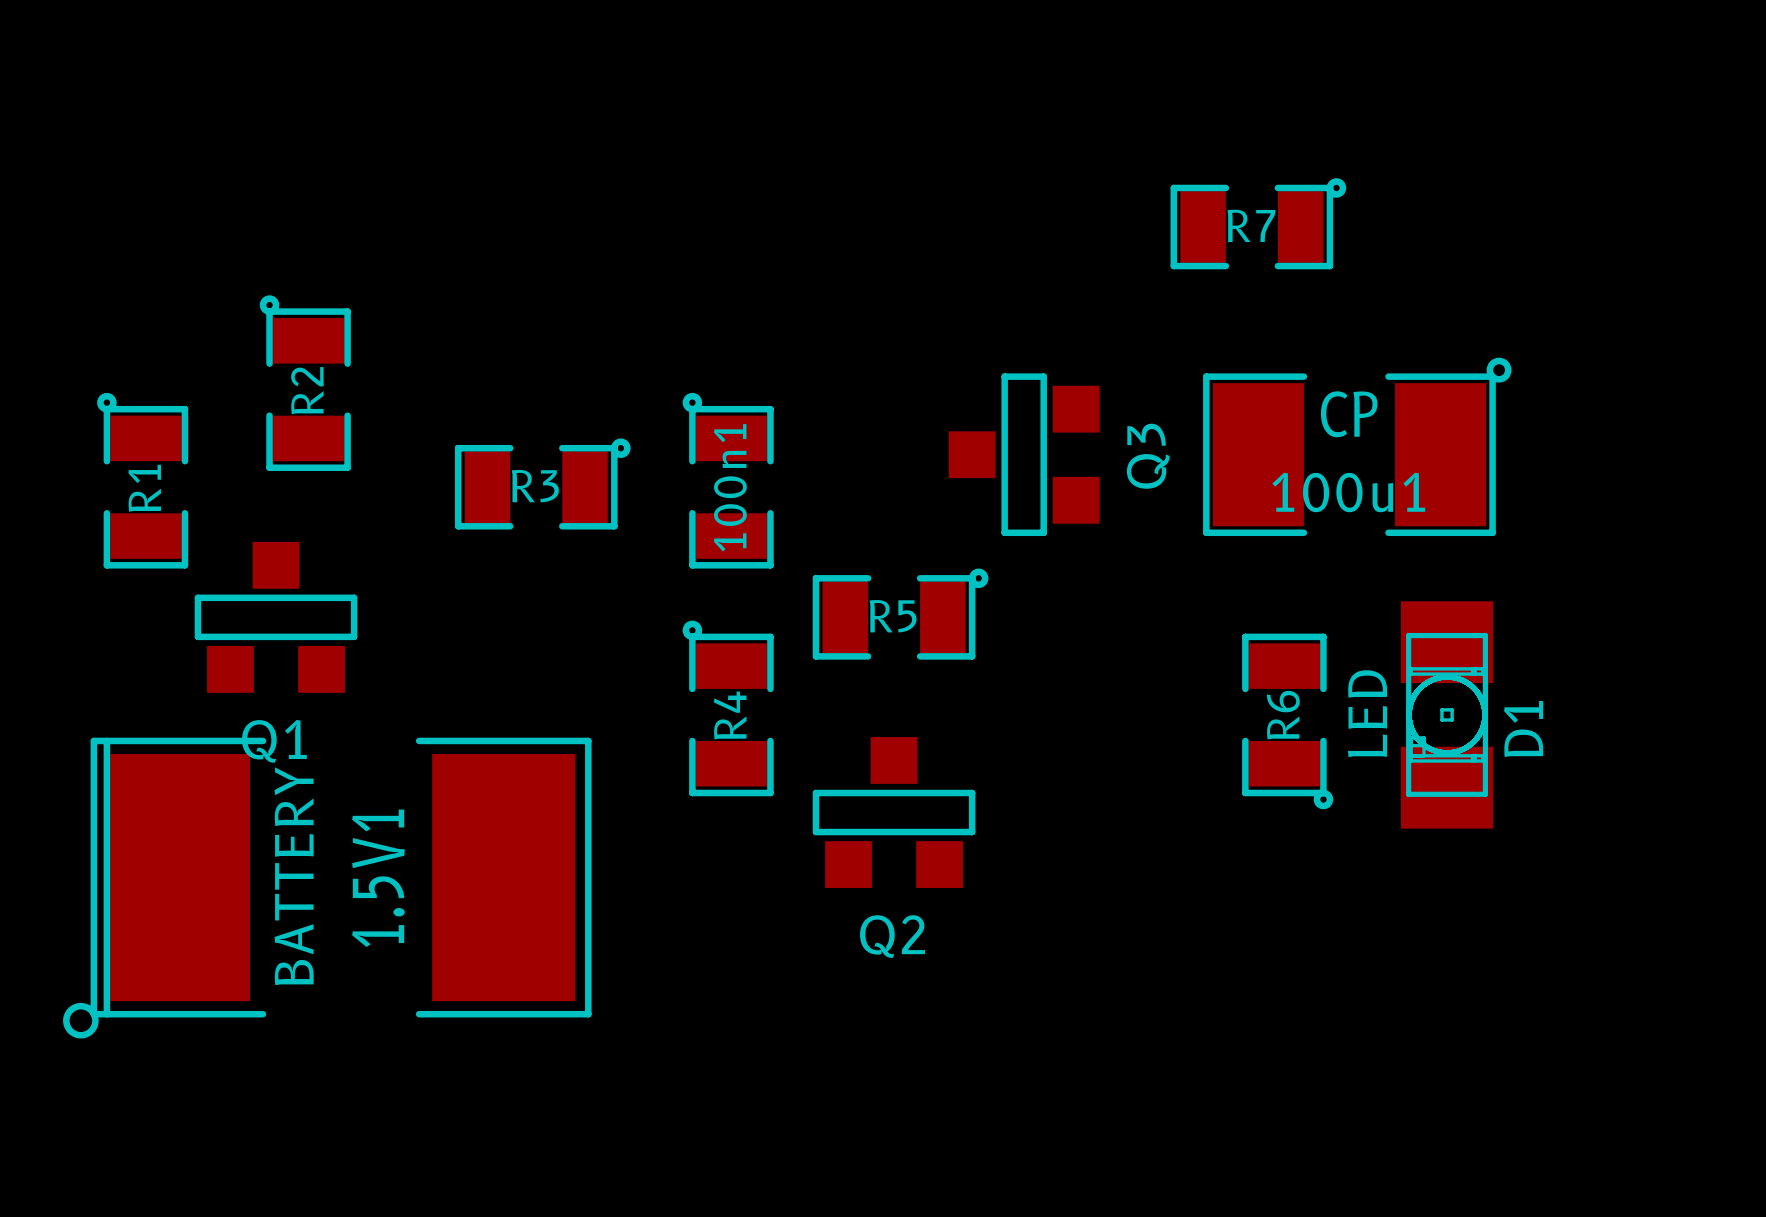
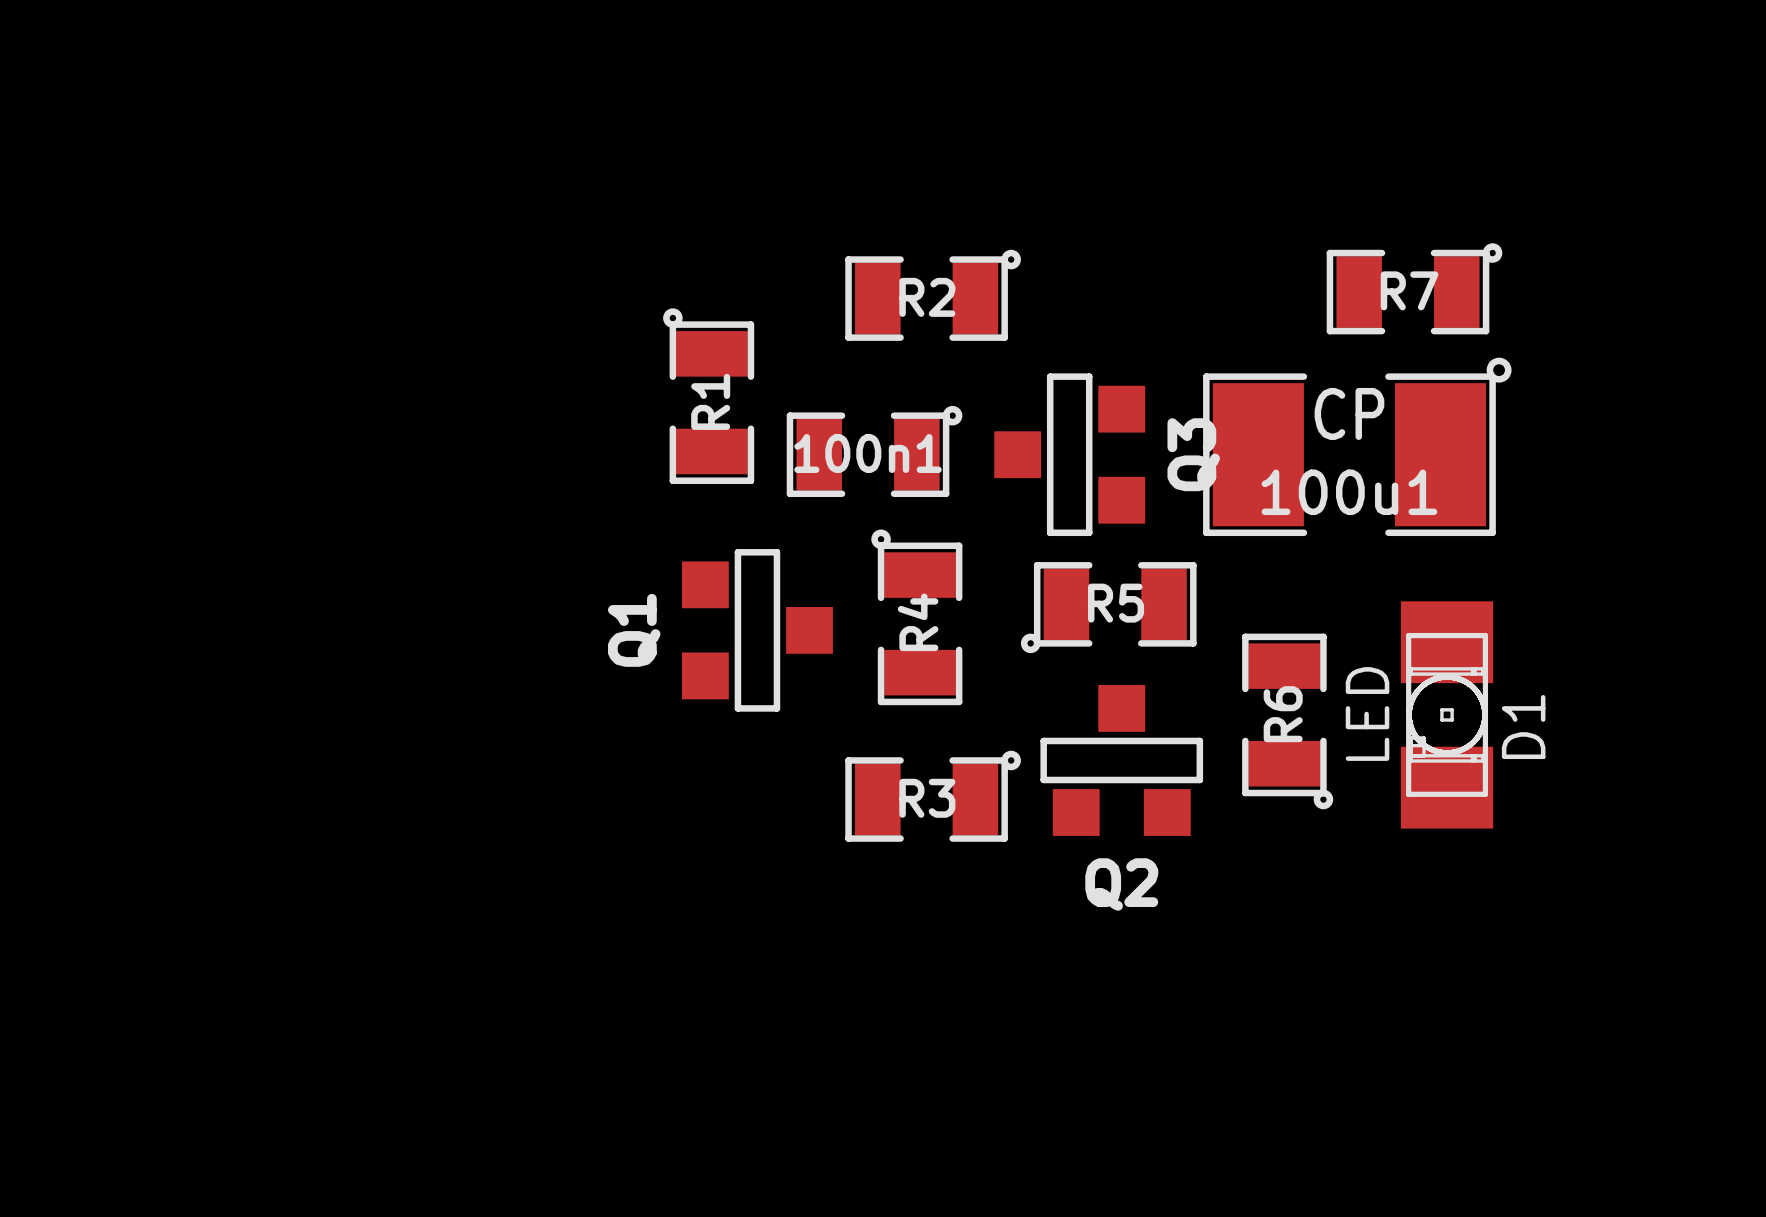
R7 position: (1258, 223) -> (1414, 288)
R2 rotation: 0° (305, 383) -> 90° clockwise (933, 295)
R2 position: (305, 383) -> (933, 295)
Q3 position: (1024, 454) -> (1069, 454)
R1 position: (142, 480) -> (708, 396)
100n1 rotation: 0° (728, 480) -> 90° clockwise (874, 451)
100n1 position: (728, 480) -> (874, 451)
R3 position: (542, 483) -> (933, 796)
R5 rotation: 0° (900, 614) -> 180° (1108, 607)
R5 position: (900, 614) -> (1108, 607)
Q1 rotation: 0° (276, 617) -> 90° clockwise (757, 630)
Q1 position: (276, 617) -> (757, 630)
R4 position: (728, 708) -> (916, 617)
Q2 position: (894, 812) -> (1121, 760)
1.5V1: BATTERY (327, 888) -> none

